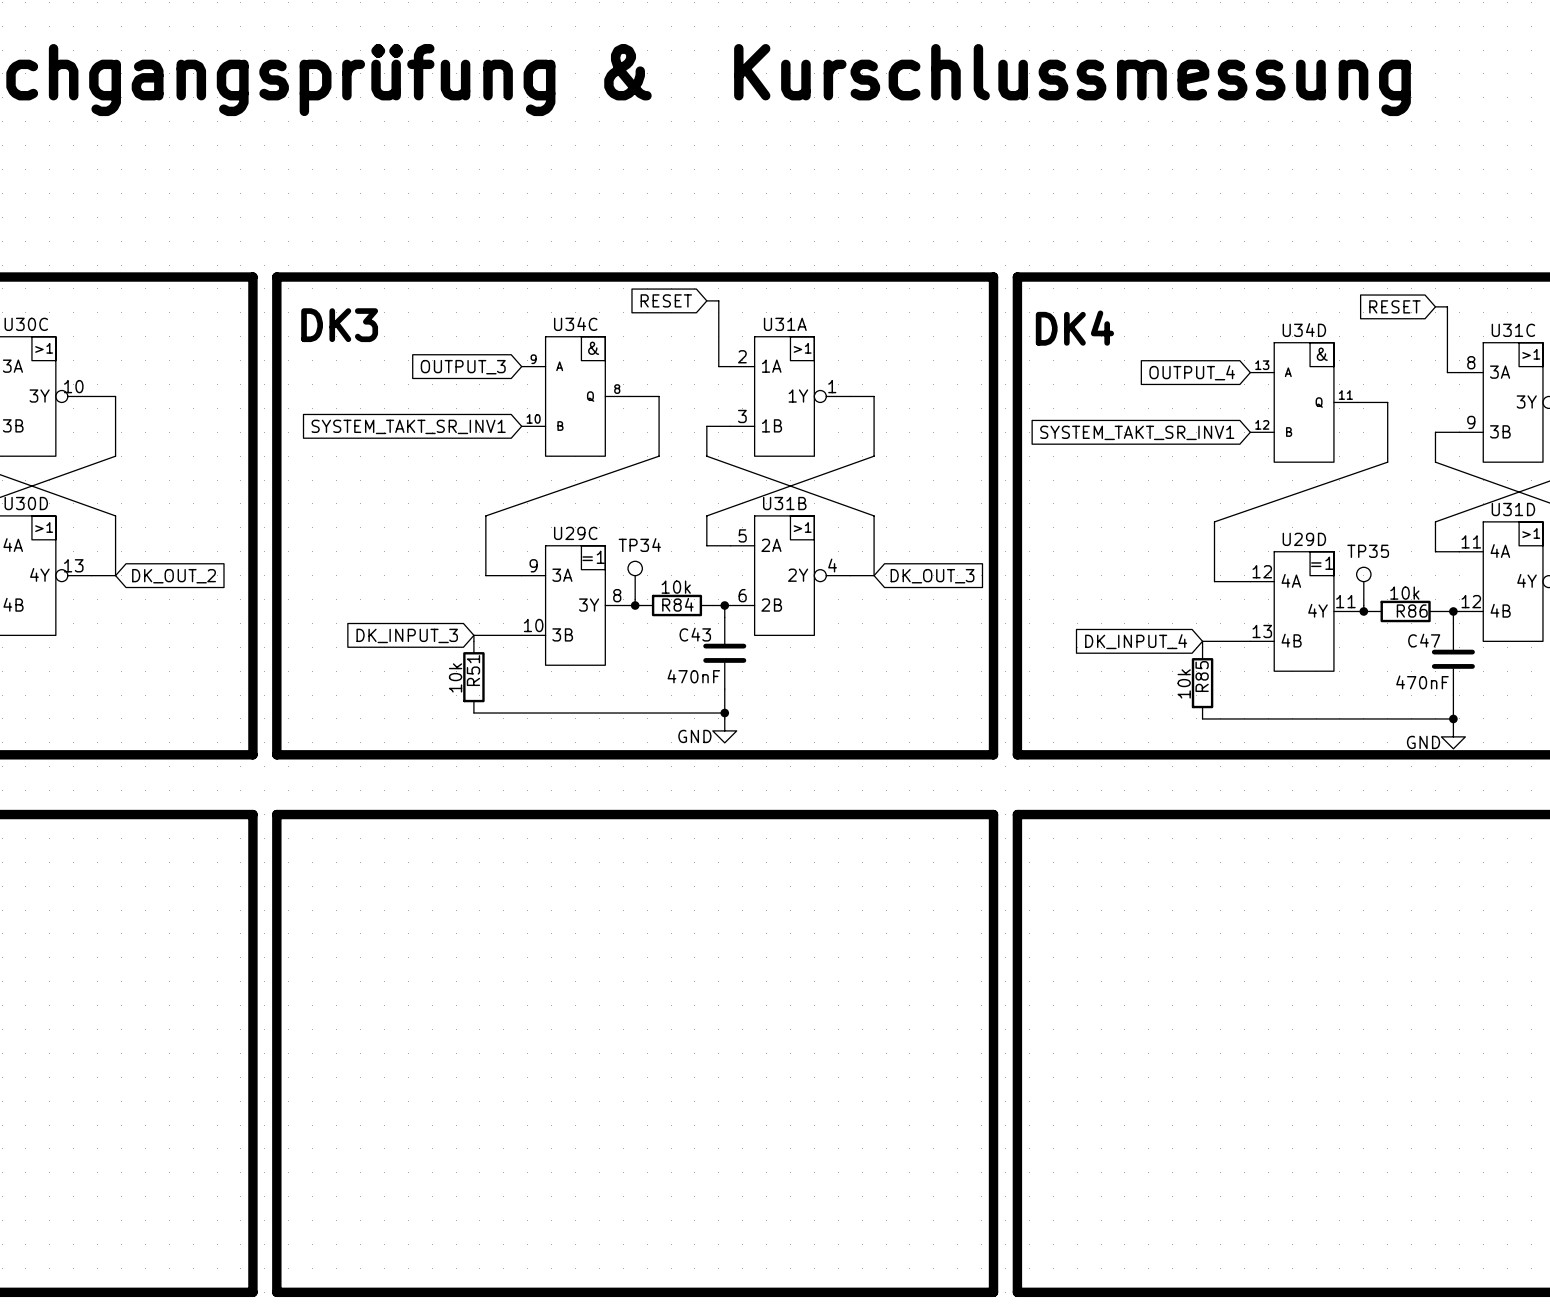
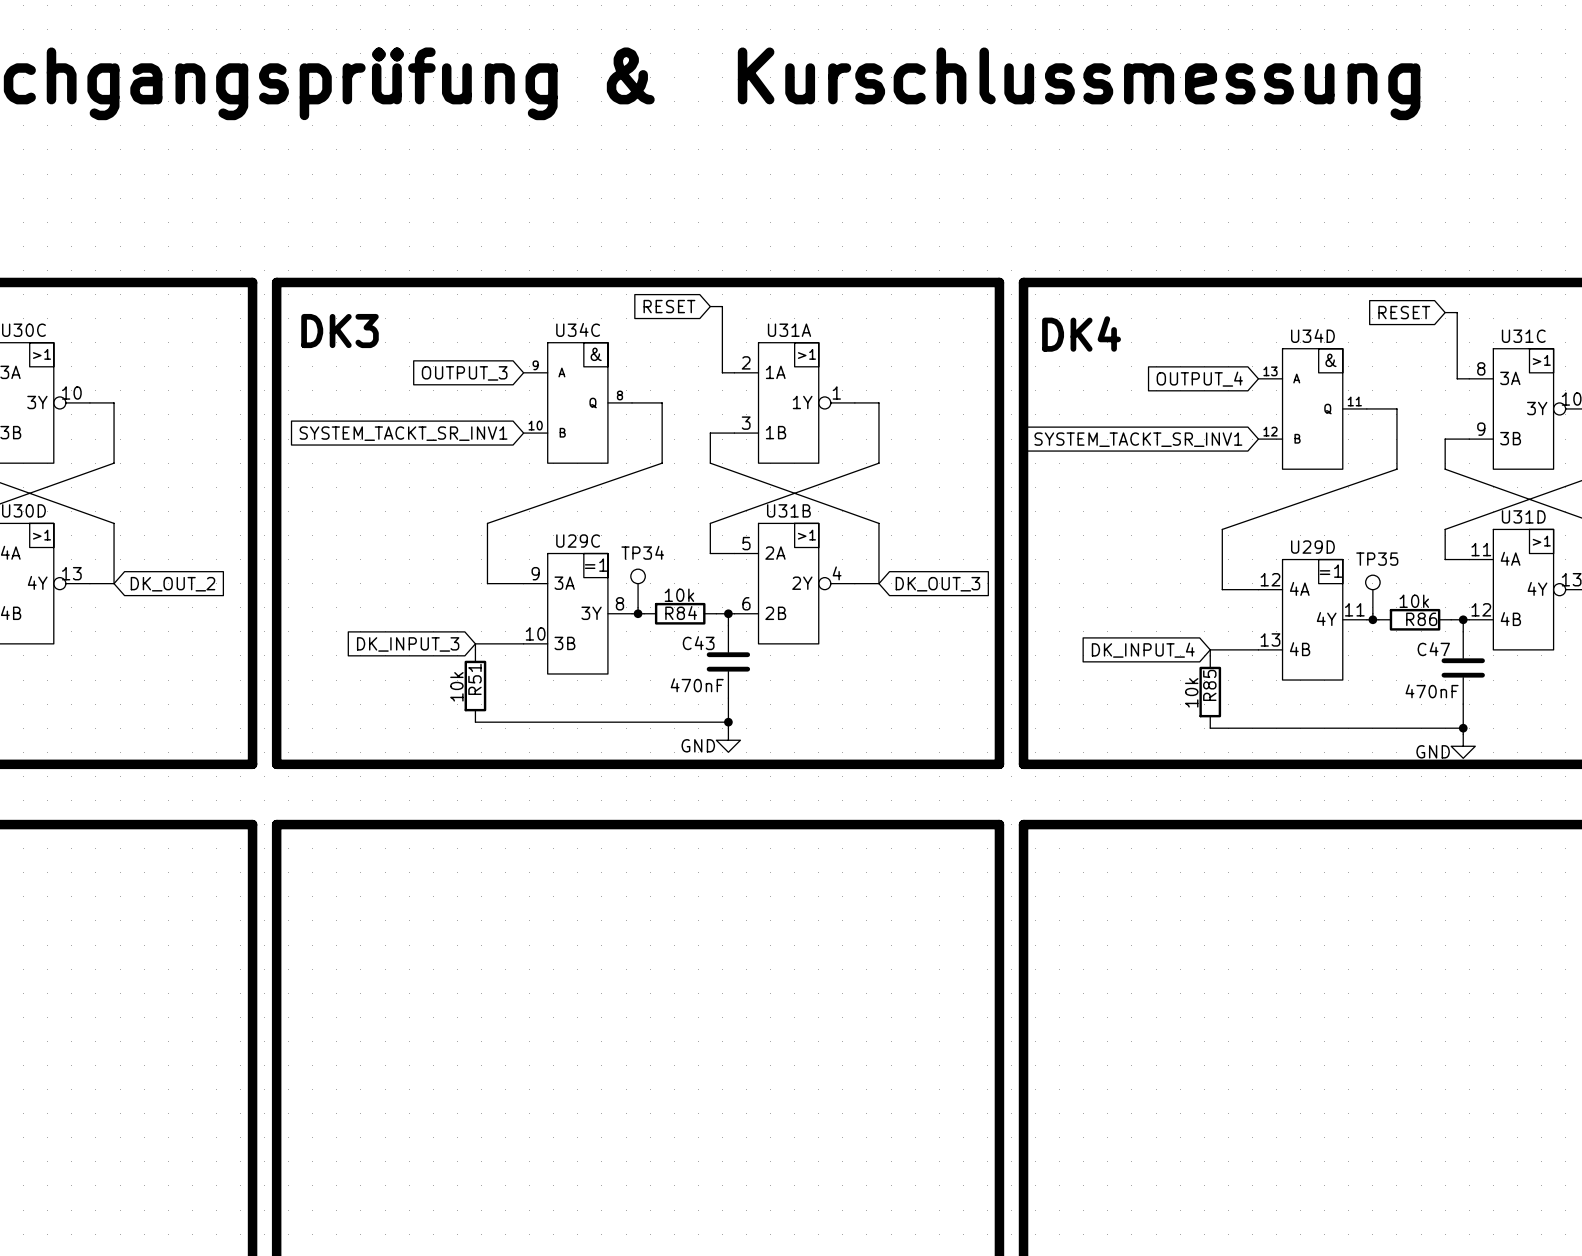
global label: SYSTEM_TAKT_SR_INV1 (408, 426) -> SYSTEM_TACKT_SR_INV1 (403, 433)
global label: SYSTEM_TAKT_SR_INV1 (1137, 432) -> SYSTEM_TACKT_SR_INV1 (1138, 439)

